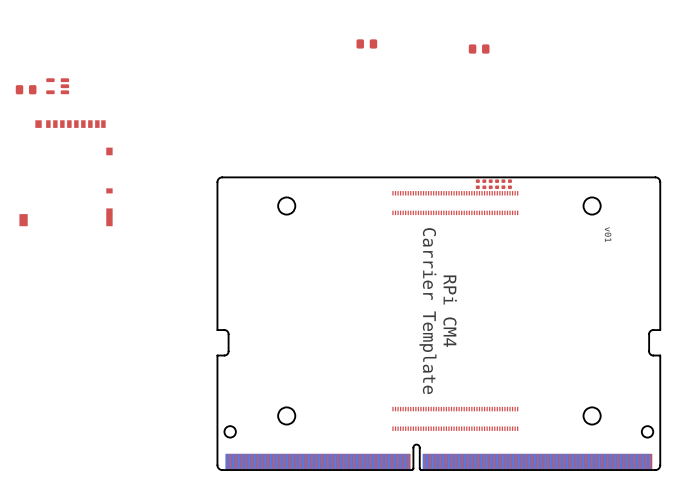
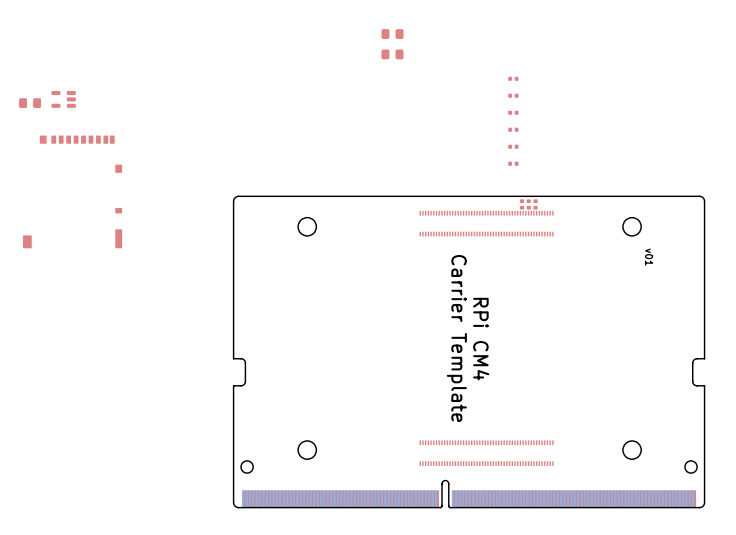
part position: (479, 49) -> (392, 34)
part: none -> (513, 78)
part: none -> (513, 95)
part: none -> (513, 112)
part: none -> (513, 129)
part: none -> (513, 146)
part: none -> (513, 163)
part: (477, 184) -> none
part: (484, 184) -> none
part: (490, 184) -> none
part: (497, 184) -> none
part: (503, 184) -> none
part: (509, 184) -> none
part: none -> (522, 204)
part: none -> (528, 204)
part: none -> (535, 204)

